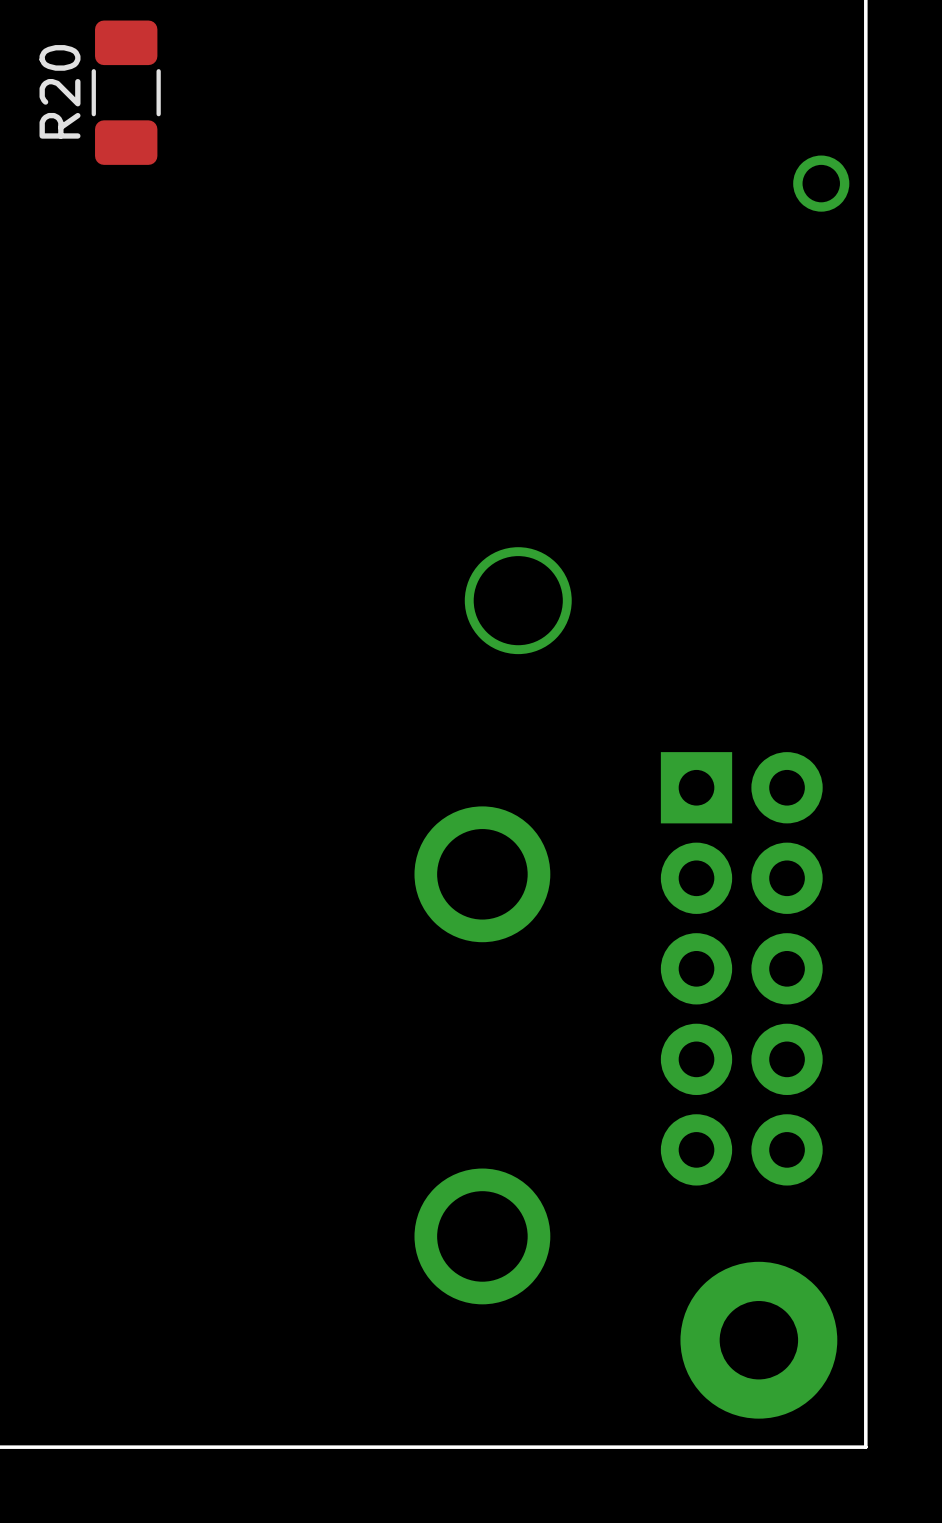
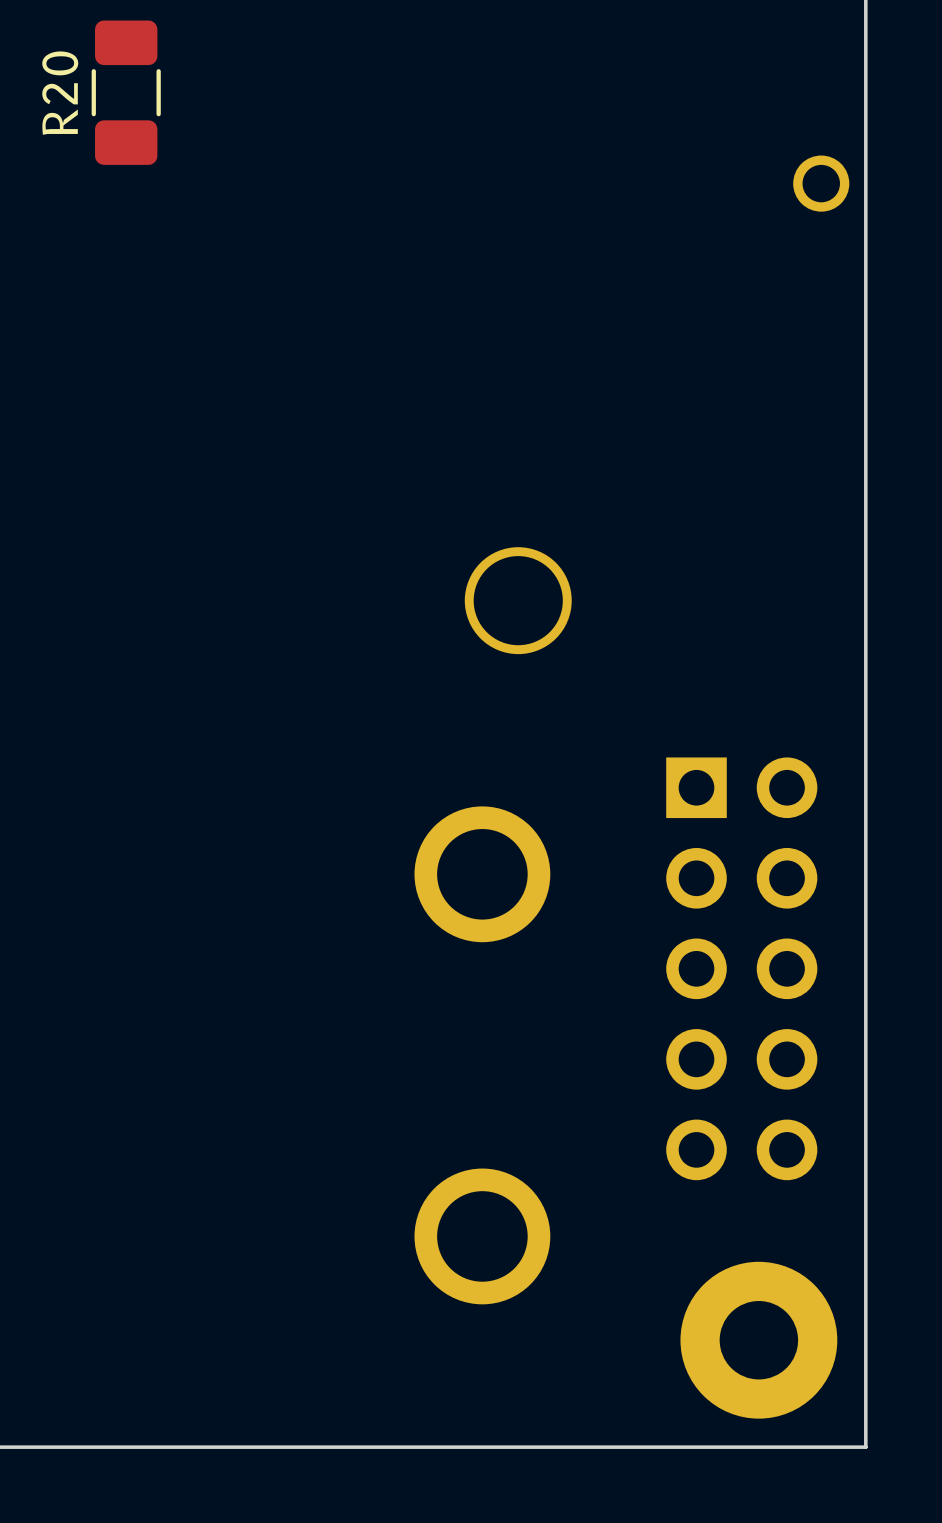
part footprint: [660, 752, 823, 1186] -> [666, 757, 818, 1181]

